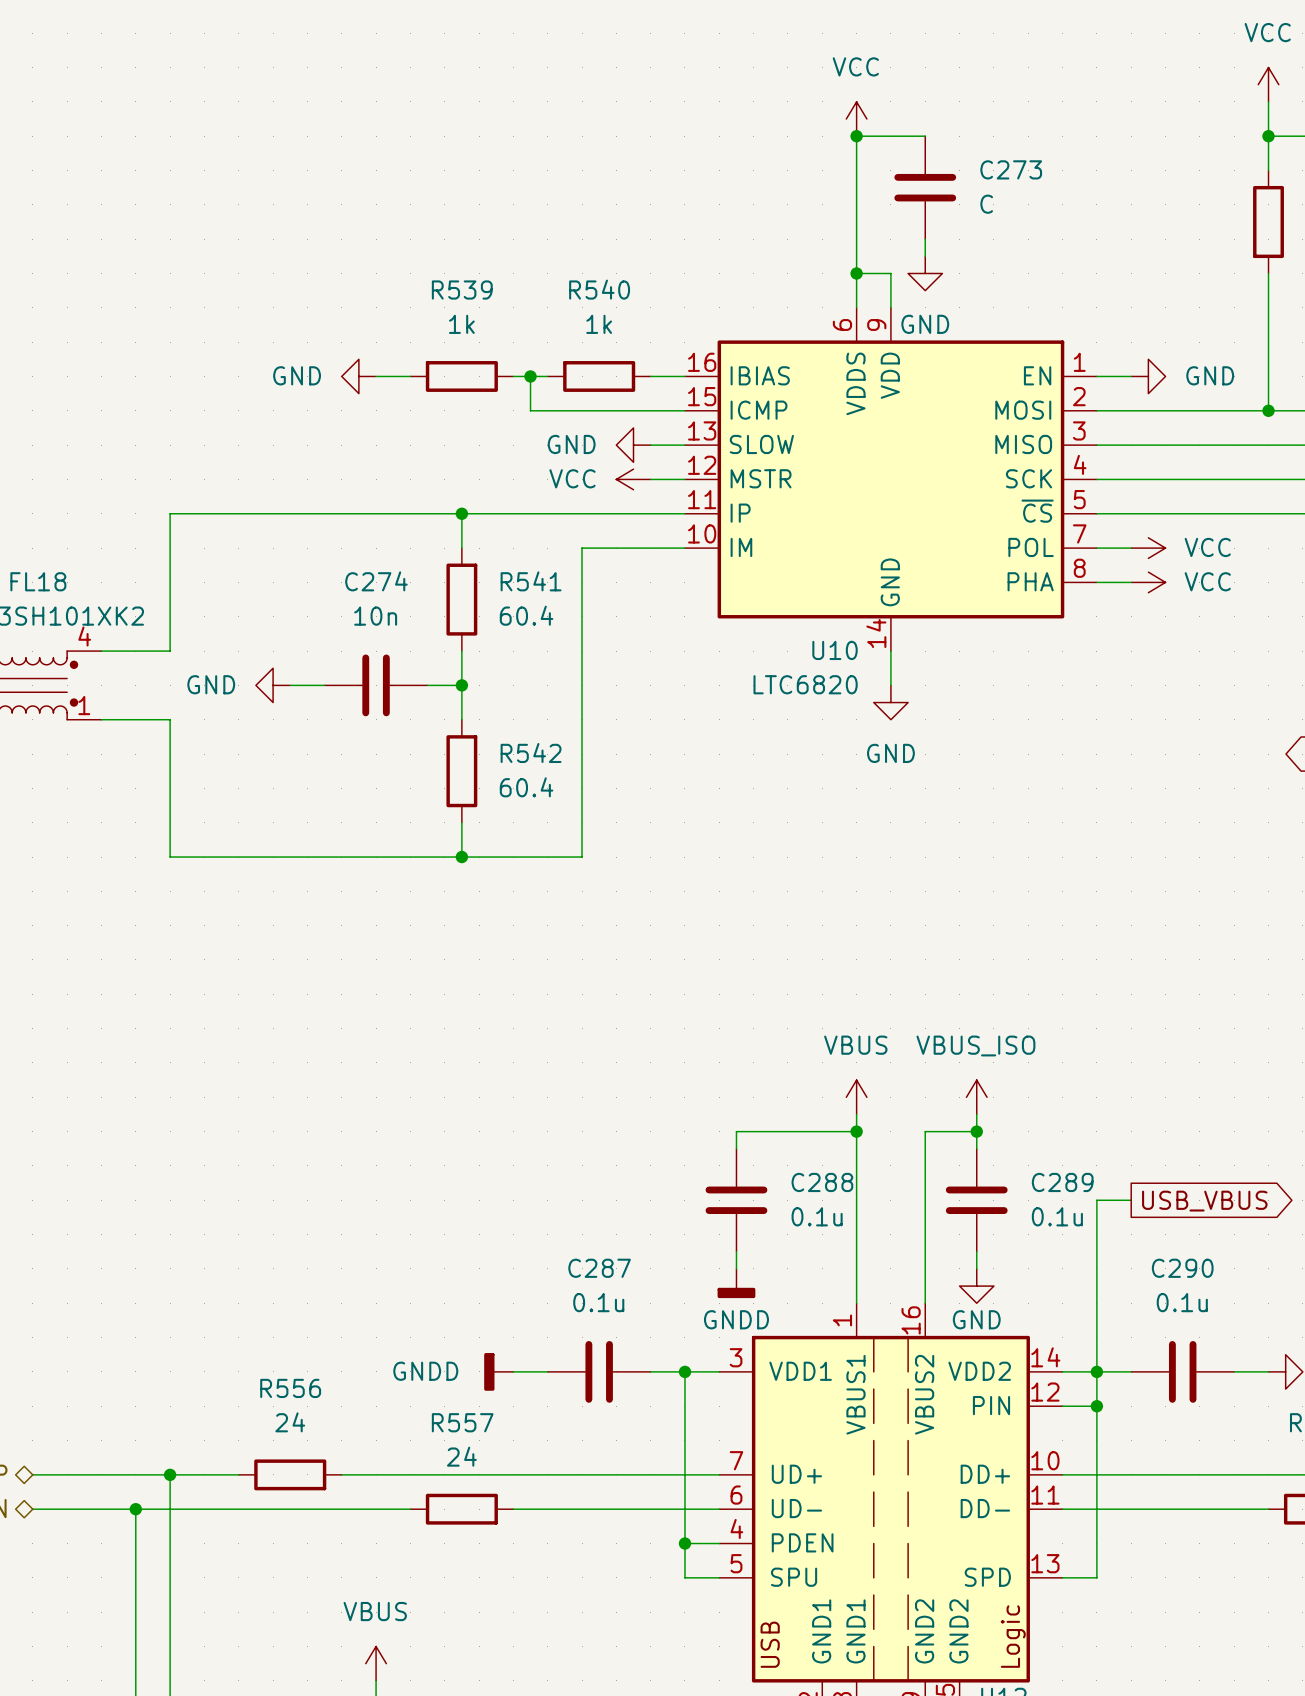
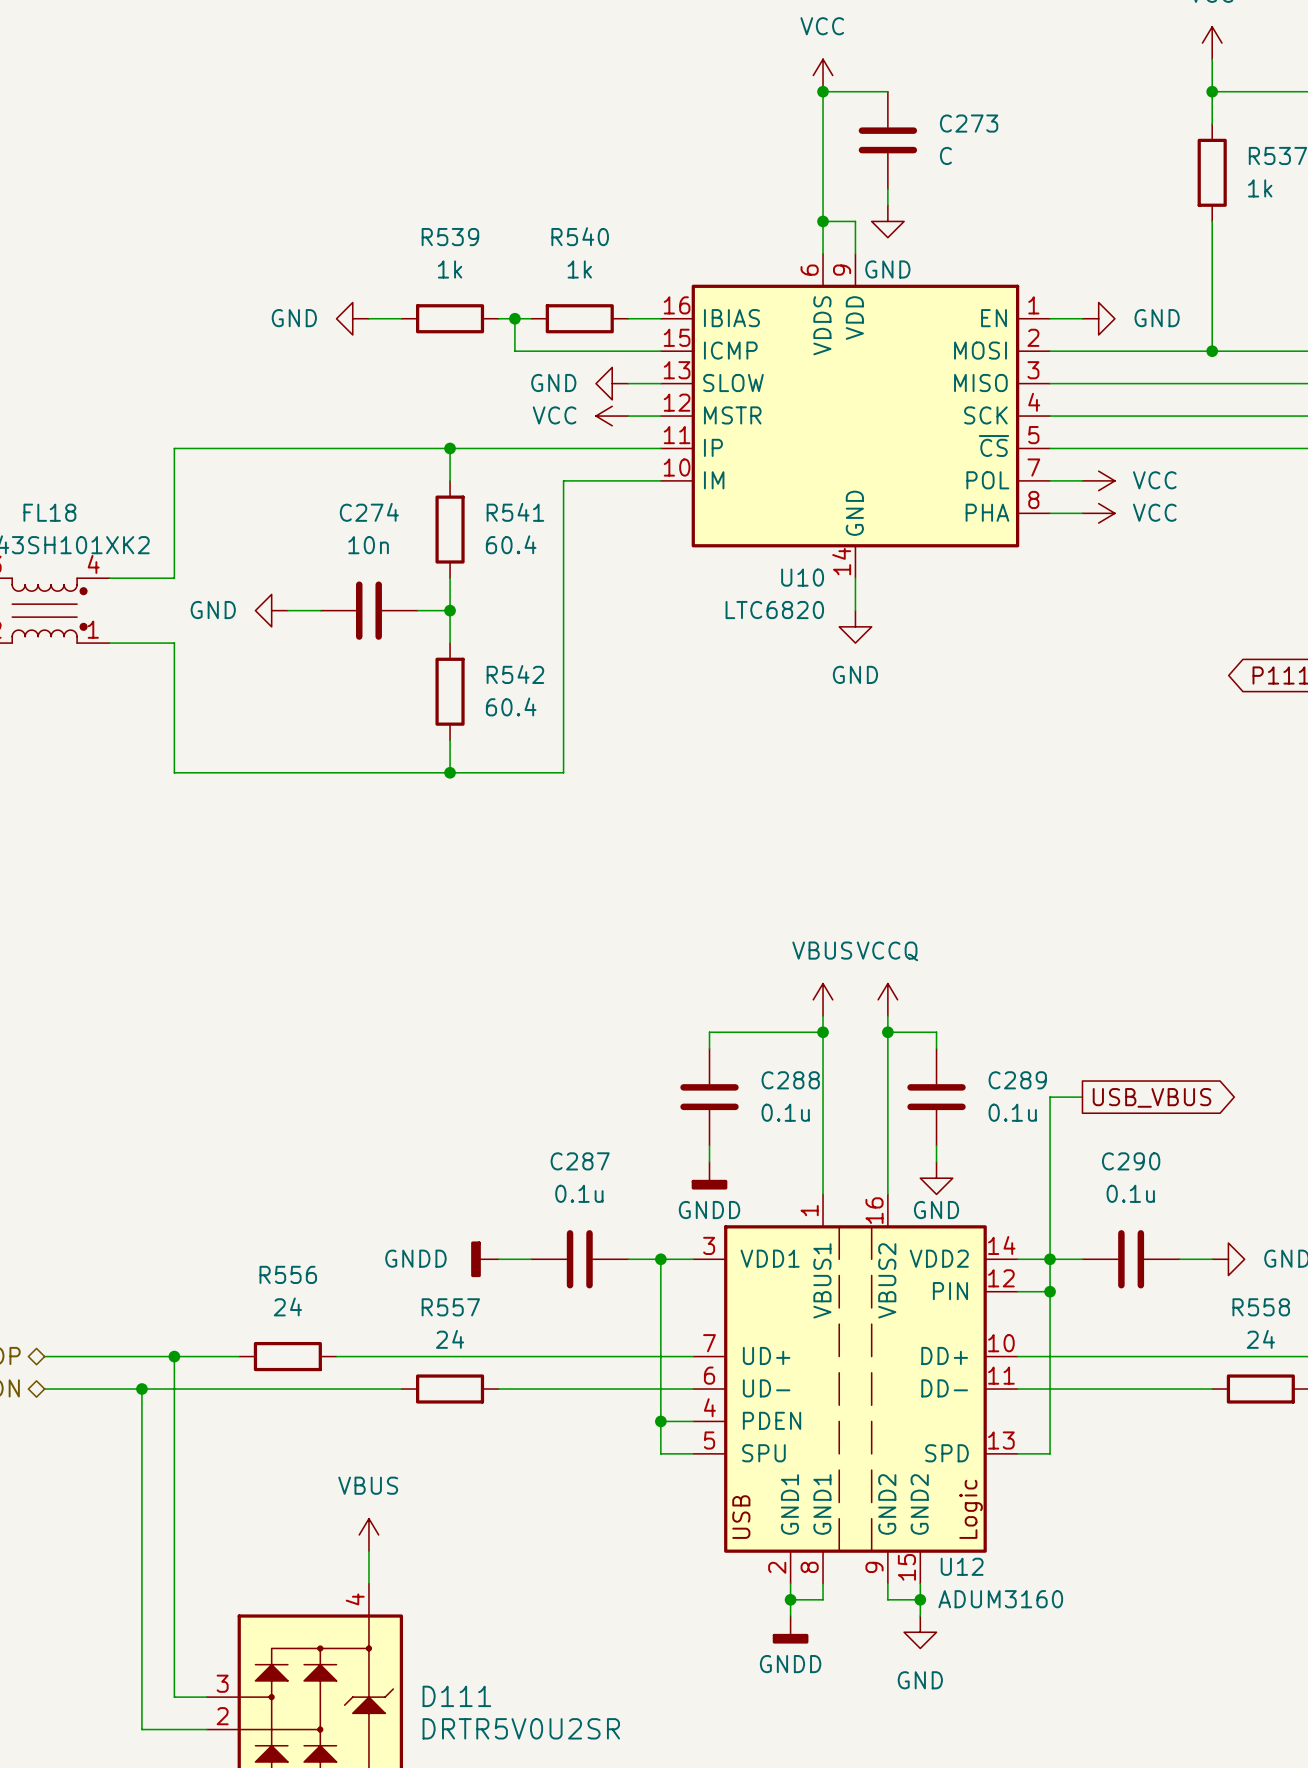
power symbol: none -> VCCQ (887, 999)
power symbol: VBUS_ISO (976, 1097) -> none
wire: (976, 1114) (976, 1131) -> (887, 1016) (887, 1032)
junction position: (976, 1131) -> (887, 1032)

